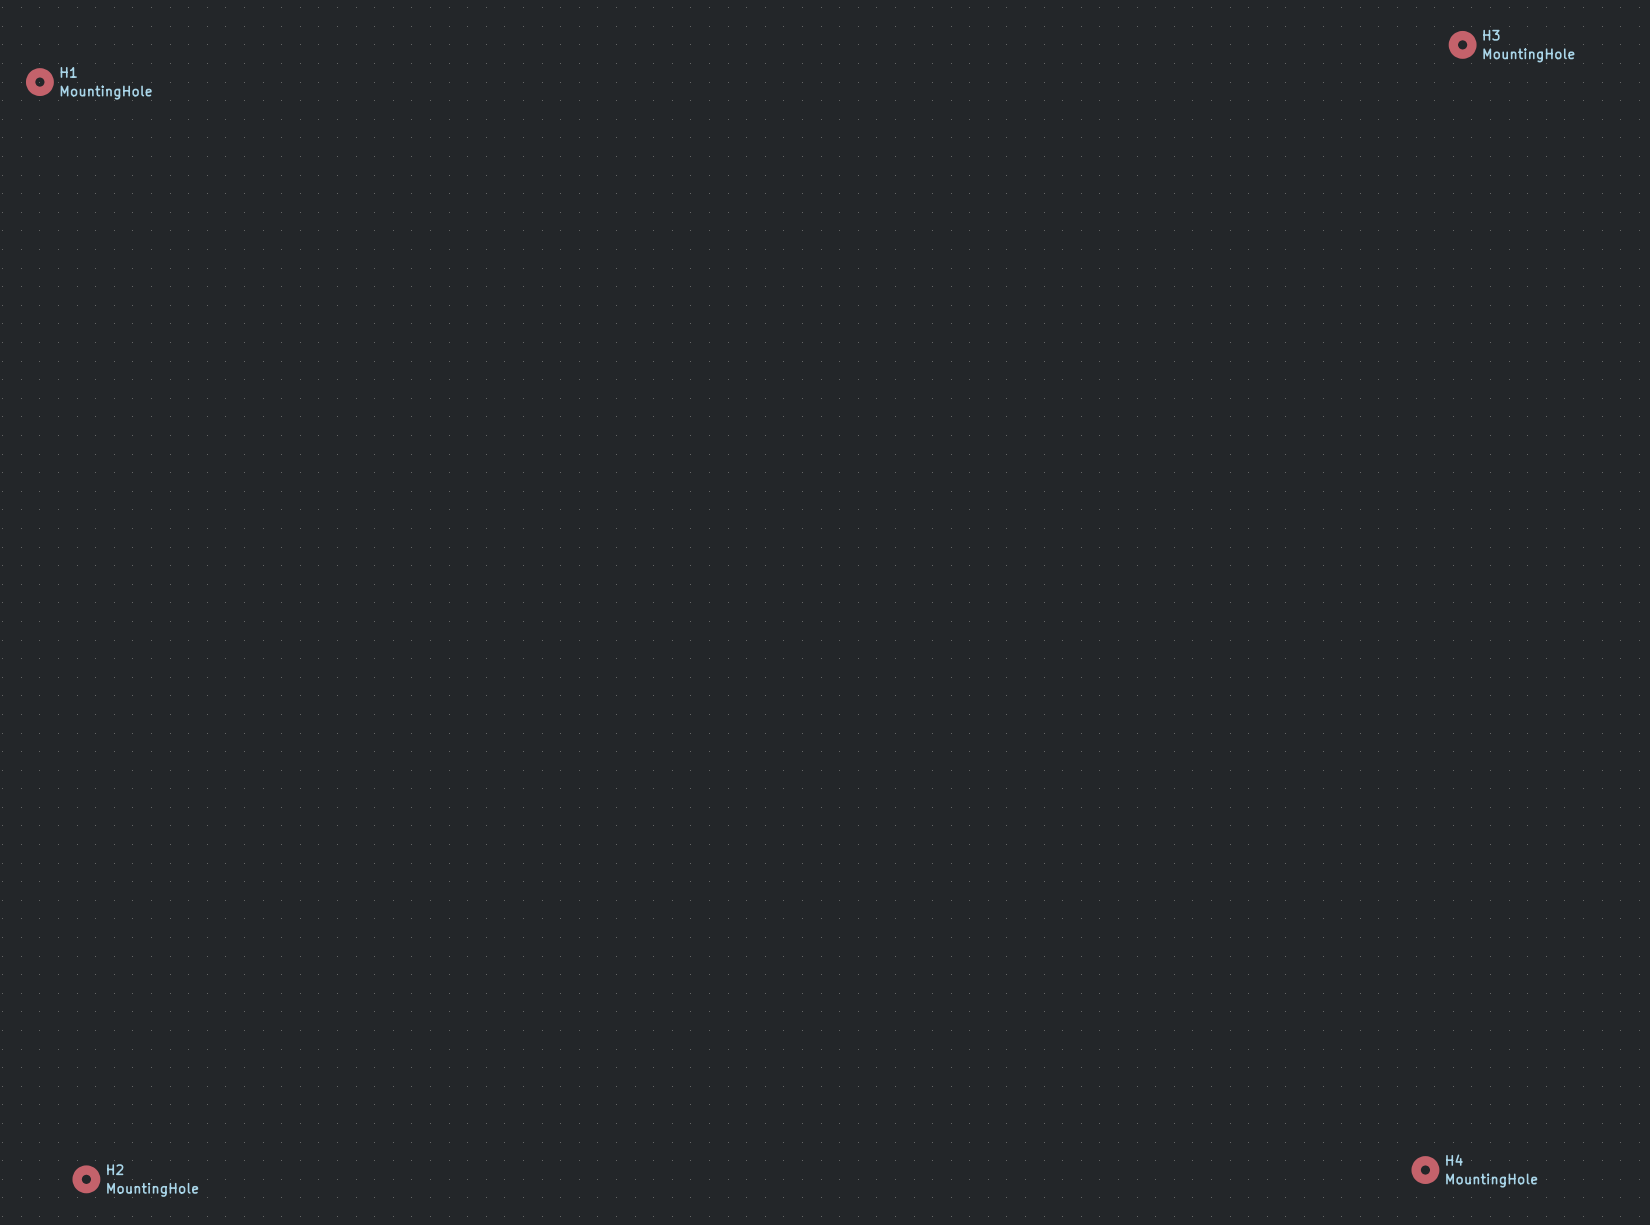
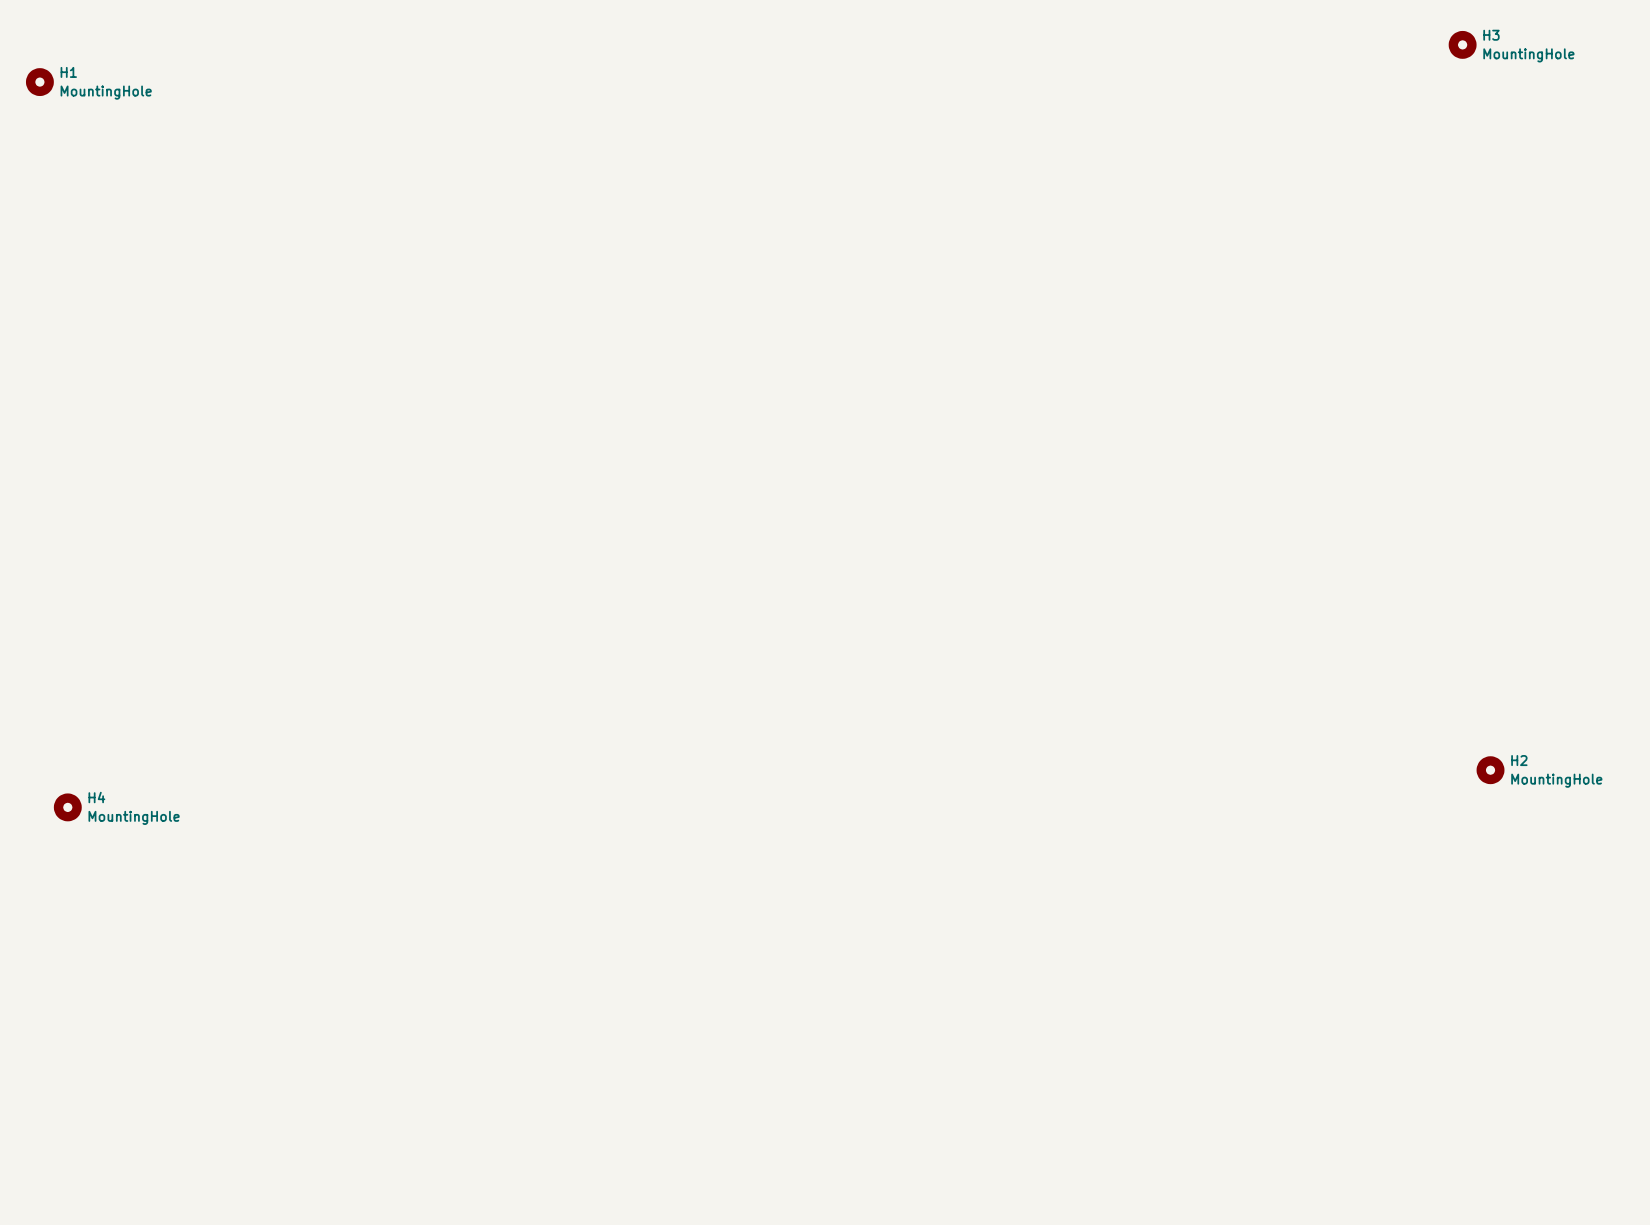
H4 position: (1425, 1170) -> (67, 807)
H2 position: (86, 1179) -> (1490, 770)

